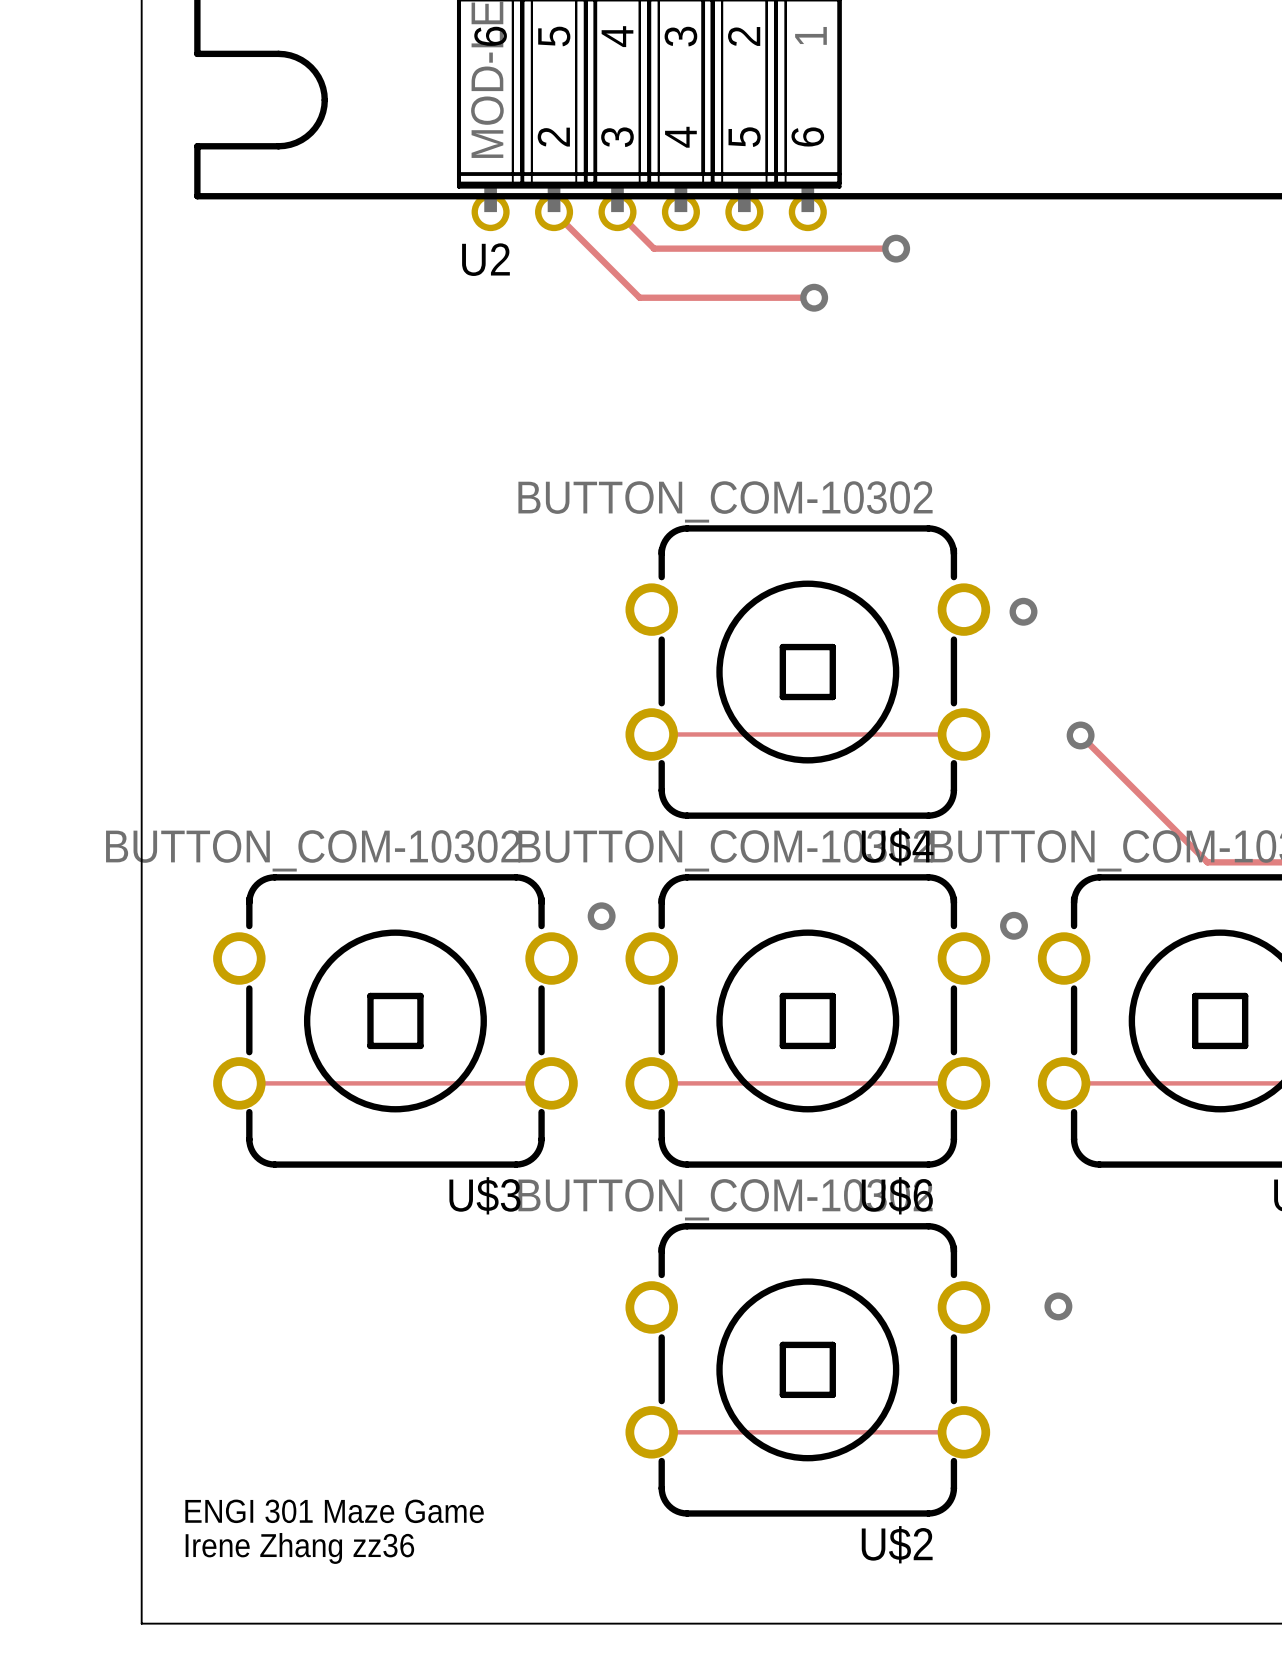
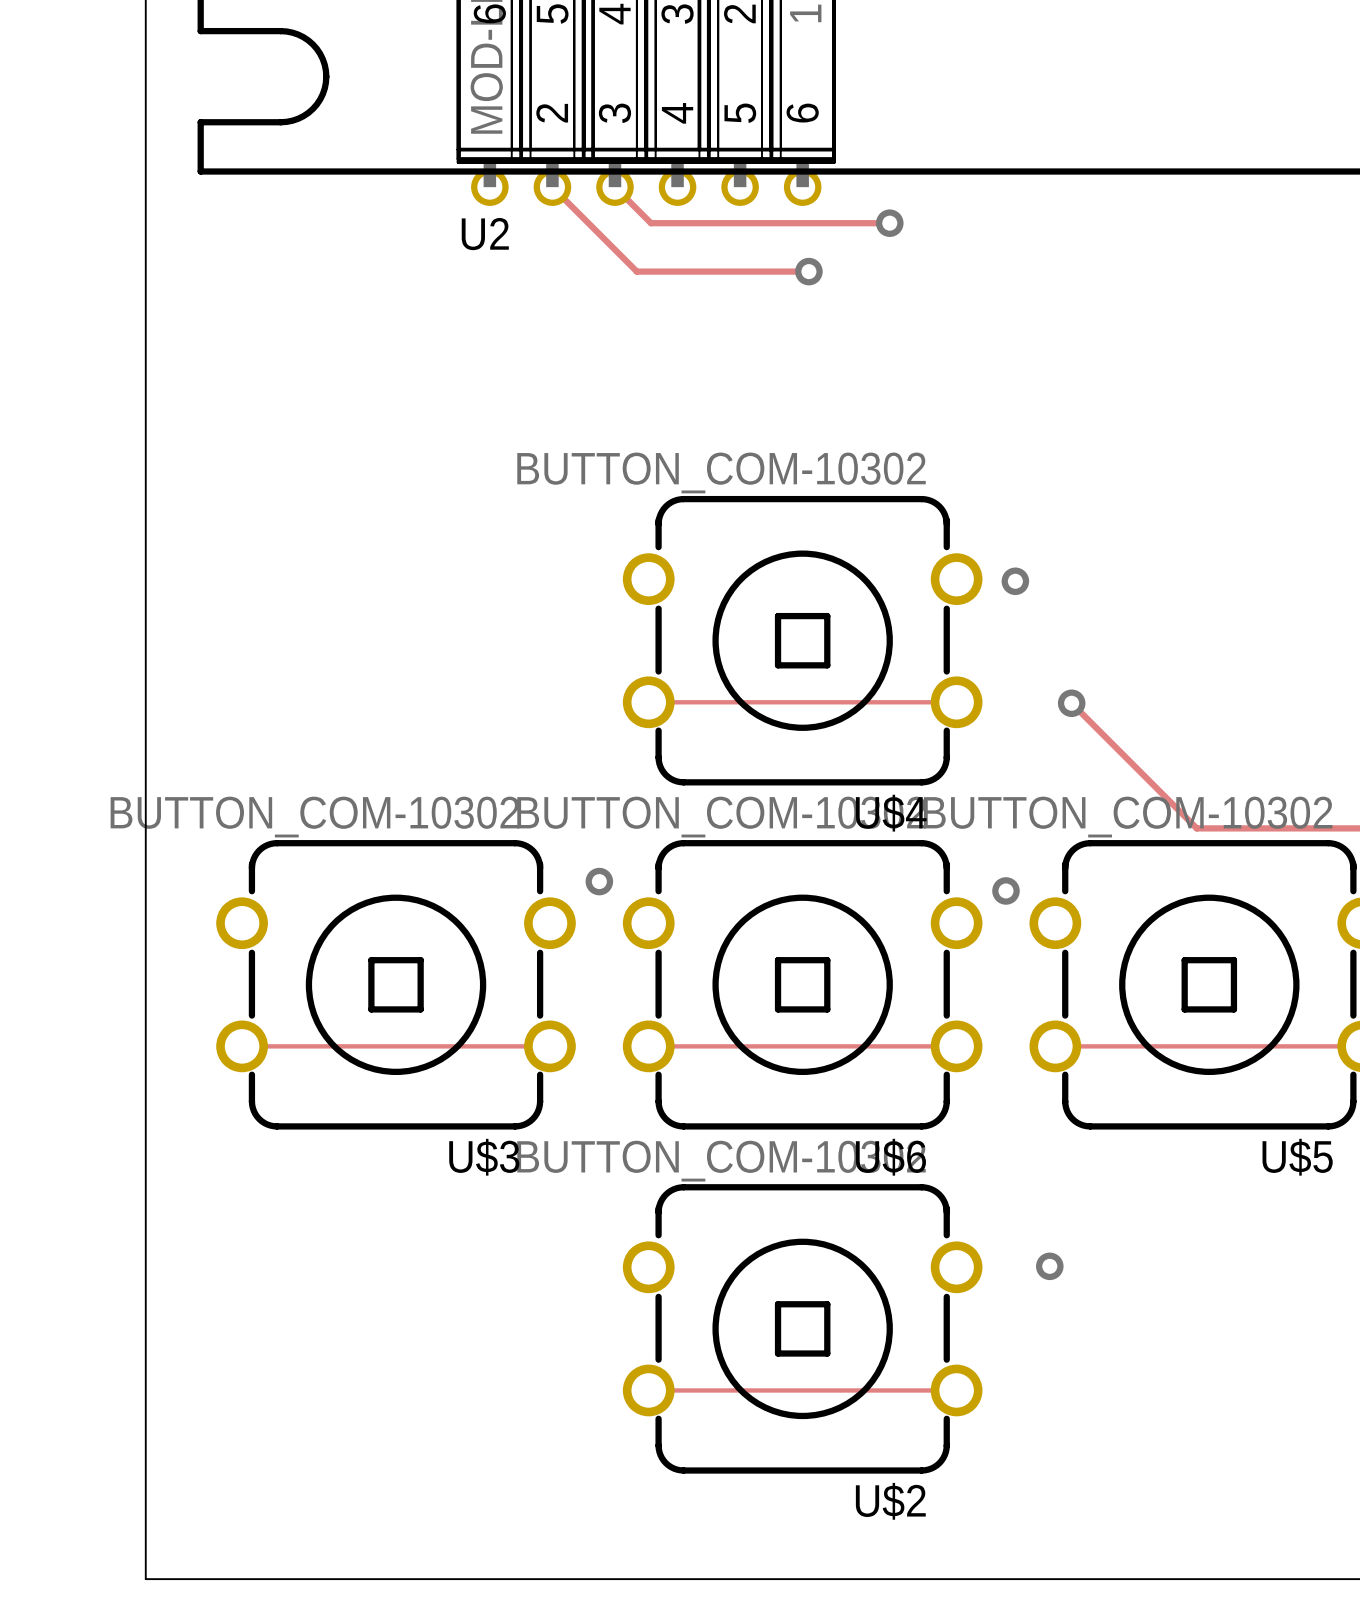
text: ENGI 301 Maze Game (334, 1511) -> none
text: Irene Zhang zz36 (299, 1548) -> none

